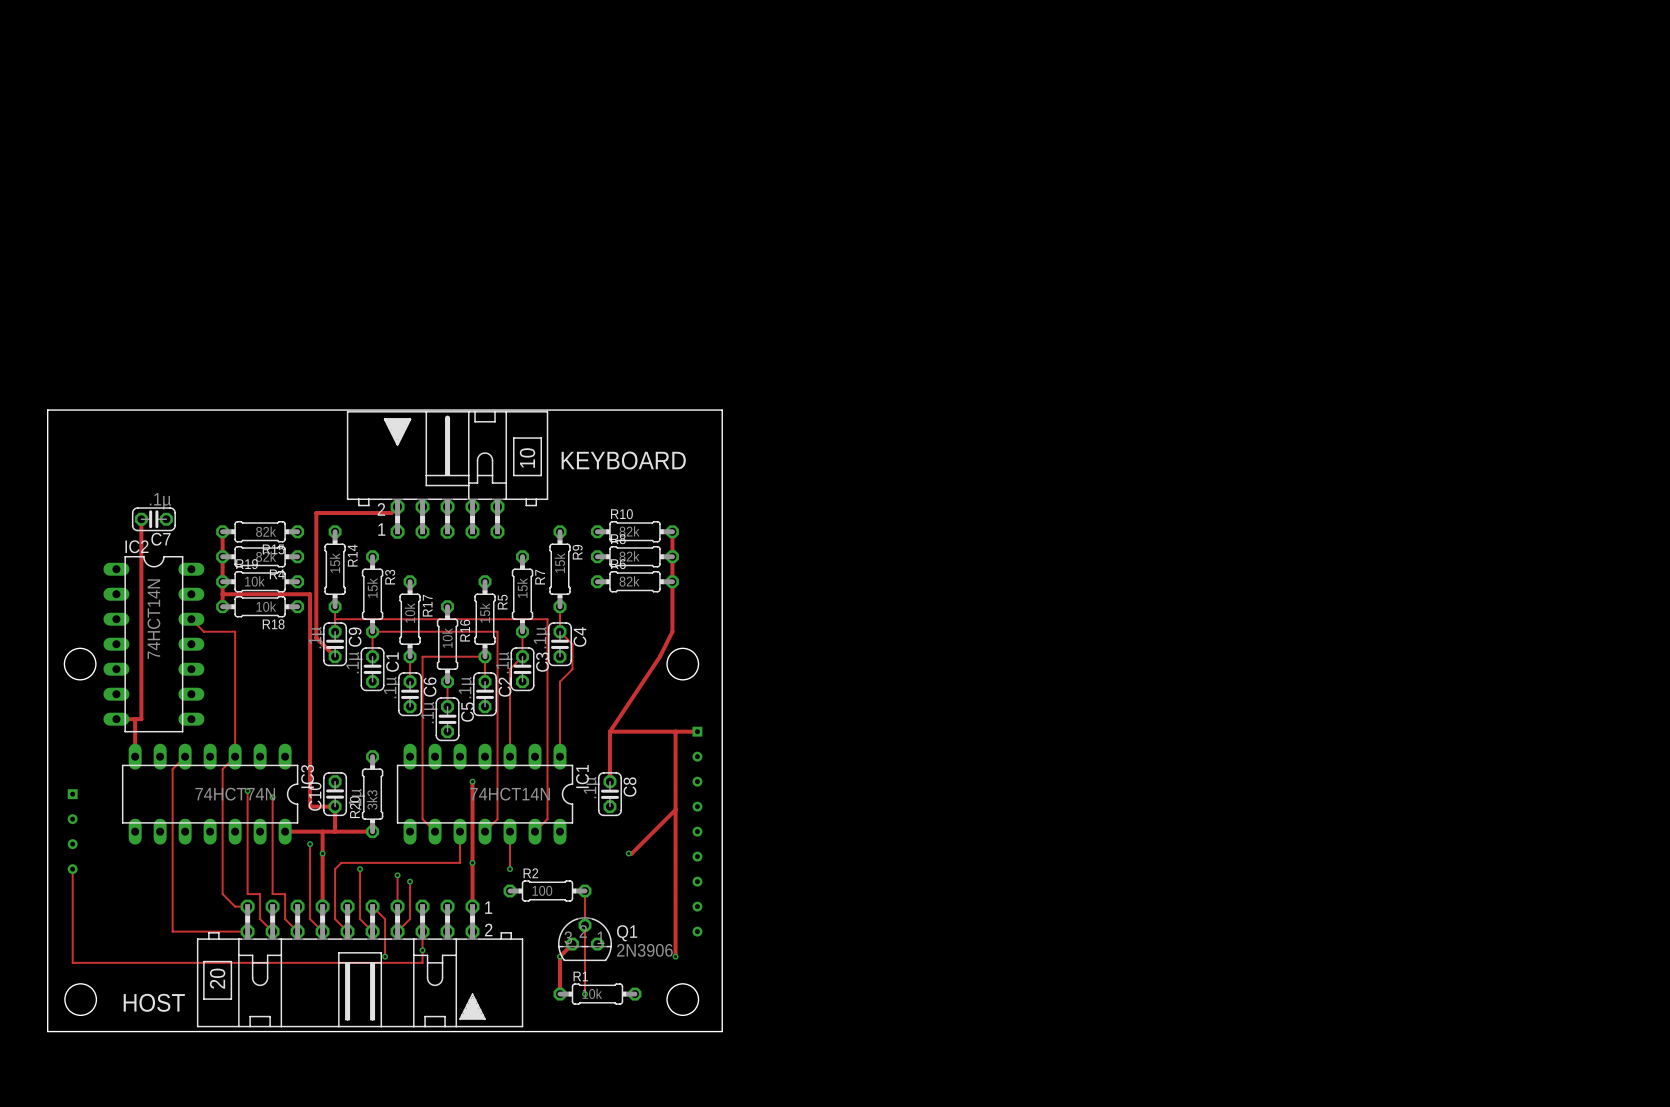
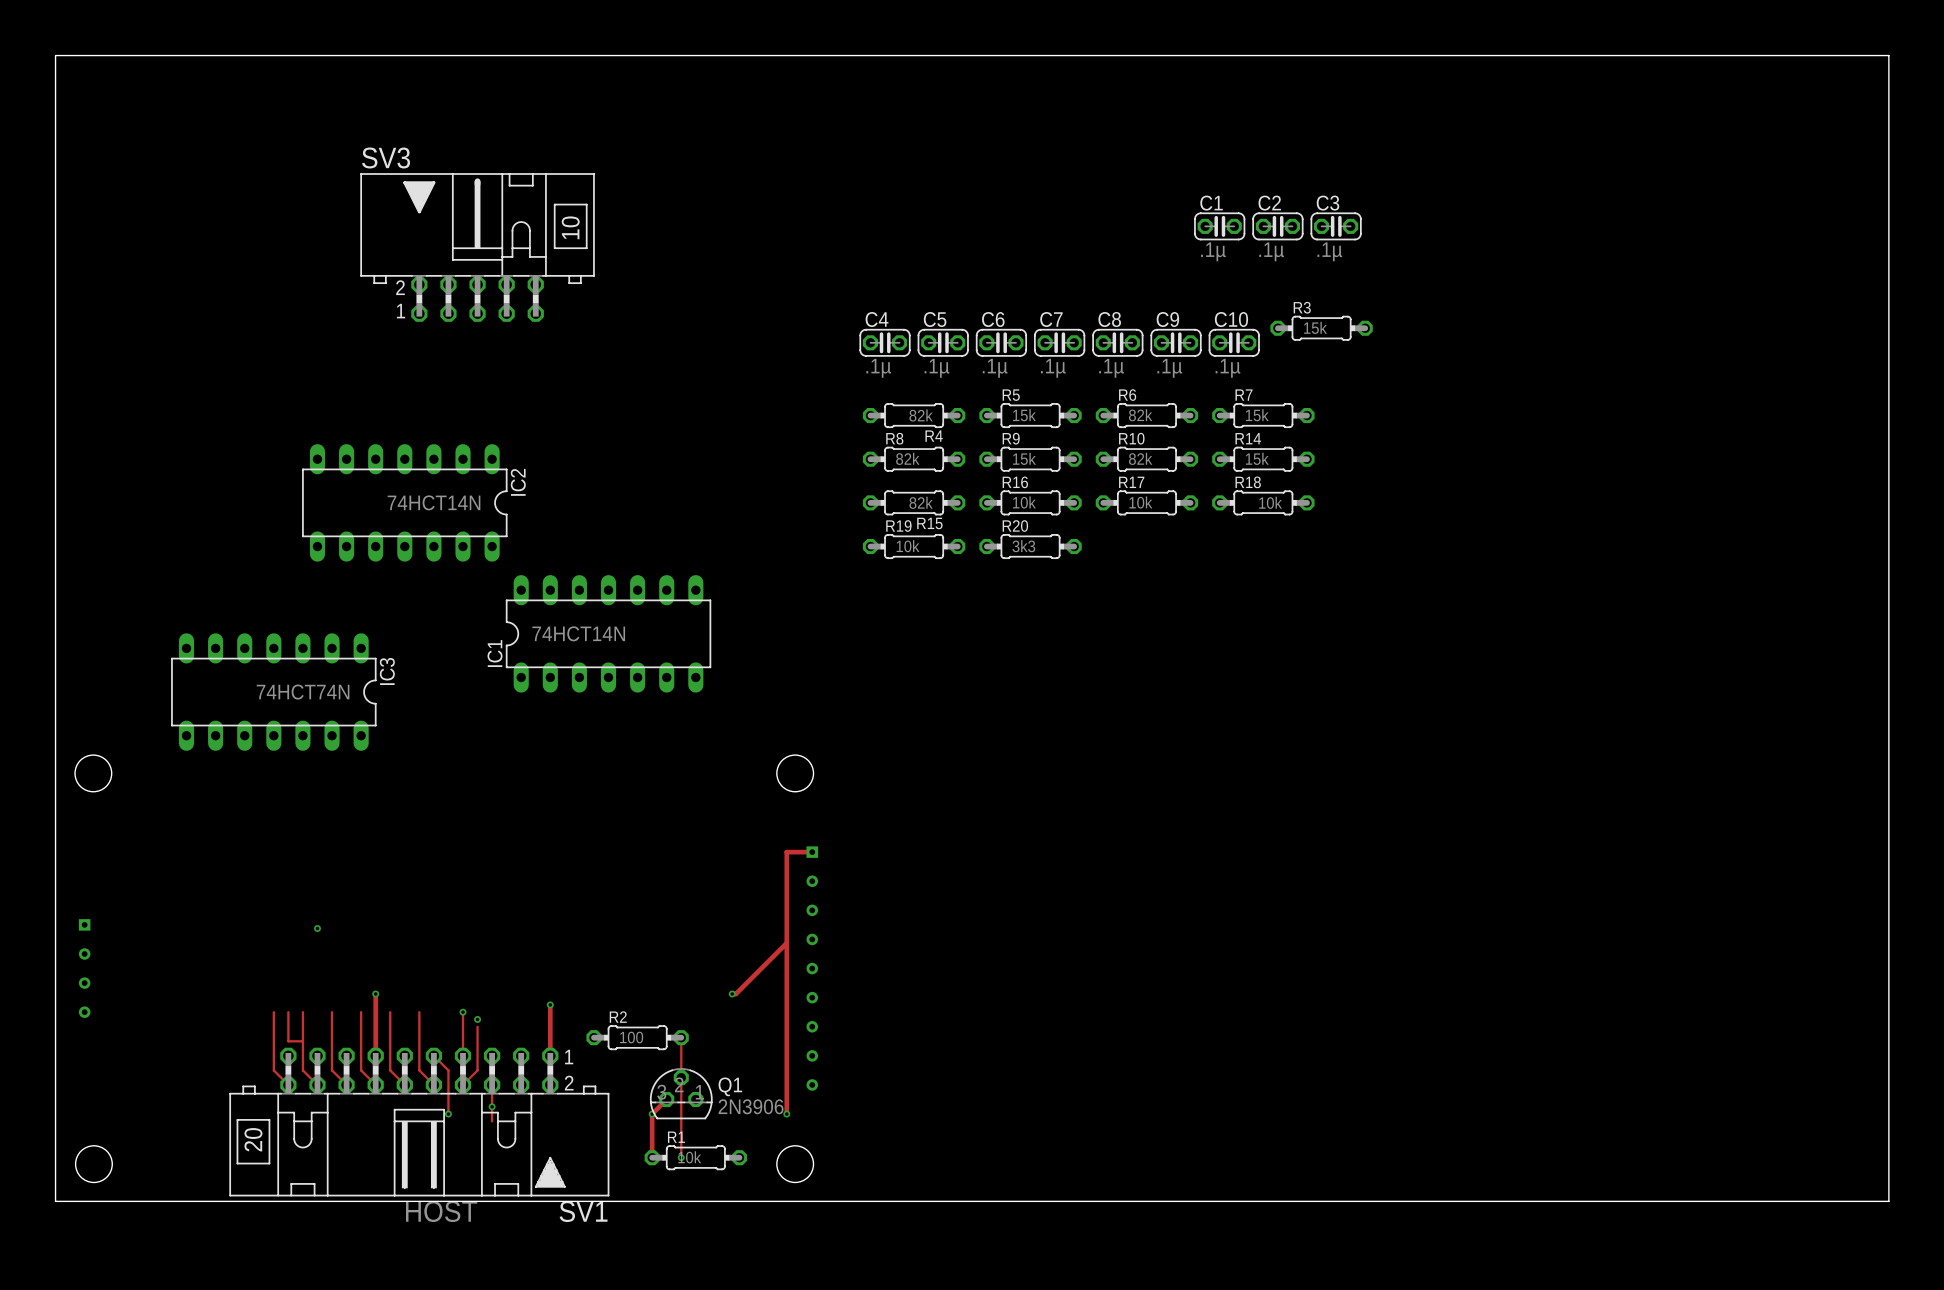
SV3: none -> (477, 247)
board edge: (47, 410) (722, 410) (722, 1031) -> (55, 477) (55, 55) (1888, 55) (1888, 1201) (841, 1201)
KEYBOARD: (447, 474) -> none
track: (397, 506) (391, 513) (316, 513) (316, 637) (335, 656) -> none
track: (141, 519) (141, 719) (116, 719) -> none
C7 rotation: 0° (153, 519) -> 180° (1059, 342)
C7 position: (153, 519) -> (1059, 342)
track: (222, 531) (222, 606) -> none
R15 position: (260, 531) -> (914, 502)
R10 position: (634, 531) -> (1146, 459)
track: (672, 531) (672, 631) (659, 656) (609, 731) -> none
R9 name position: R9 (577, 552) -> R9 (1011, 438)
R14 name position: R14 (352, 555) -> R14 (1248, 438)
R4 position: (260, 556) -> (914, 415)
R8 position: (634, 556) -> (914, 459)
R14 rotation: 0° (335, 569) -> 90° clockwise (1263, 459)
R14 position: (335, 569) -> (1263, 459)
R9 rotation: 0° (559, 569) -> 90° clockwise (1030, 459)
R9 position: (559, 569) -> (1030, 459)
R3 name position: R3 (390, 577) -> R3 (1302, 307)
R7 name position: R7 (540, 577) -> R7 (1243, 395)
R19 position: (260, 581) -> (914, 546)
R6 position: (634, 581) -> (1146, 415)
track: (222, 594) (310, 594) (310, 806) (335, 806) (335, 831) -> none
R3 rotation: 0° (372, 594) -> 90° clockwise (1321, 328)
R3 position: (372, 594) -> (1321, 328)
R7 rotation: 0° (522, 594) -> 90° clockwise (1263, 415)
R7 position: (522, 594) -> (1263, 415)
R5 name position: R5 (502, 602) -> R5 (1011, 395)
R17 name position: R17 (427, 605) -> R17 (1131, 482)
R18 position: (260, 606) -> (1263, 502)
track: (335, 606) (335, 631) -> none
track: (559, 606) (559, 631) (572, 644) (572, 669) (559, 681) (559, 756) -> none
track: (191, 619) (203, 631) (235, 631) (235, 756) (222, 769) (222, 894) (235, 906) (247, 906) -> none
track: (335, 619) (547, 619) (547, 819) (535, 831) -> none
R17 rotation: 0° (410, 619) -> 90° clockwise (1146, 502)
R17 position: (410, 619) -> (1146, 502)
R5 rotation: 0° (485, 619) -> 90° clockwise (1030, 415)
R5 position: (485, 619) -> (1030, 415)
R18 name position: R18 (273, 624) -> R18 (1248, 482)
R16 name position: R16 (465, 630) -> R16 (1015, 482)
track: (522, 631) (522, 656) (510, 669) (510, 756) -> none
IC2 rotation: 0° (153, 644) -> 90° clockwise (404, 502)
IC2 position: (153, 644) -> (404, 502)
C9 rotation: 0° (335, 644) -> 90° counterclockwise (1176, 342)
C9 position: (335, 644) -> (1176, 342)
R16 rotation: 0° (447, 644) -> 90° clockwise (1030, 502)
R16 position: (447, 644) -> (1030, 502)
C4 rotation: 0° (559, 644) -> 90° counterclockwise (885, 342)
C4 position: (559, 644) -> (885, 342)
track: (372, 656) (372, 631) (497, 631) (497, 819) (485, 831) -> none
track: (410, 656) (410, 681) -> none
C1 rotation: 0° (372, 669) -> 90° counterclockwise (1219, 226)
C1 position: (372, 669) -> (1219, 226)
C3 rotation: 0° (522, 669) -> 90° counterclockwise (1336, 226)
C3 position: (522, 669) -> (1336, 226)
track: (447, 681) (447, 706) -> none
track: (485, 681) (485, 656) (422, 656) (422, 819) (435, 831) -> none
C6 rotation: 0° (410, 694) -> 90° counterclockwise (1001, 342)
C6 position: (410, 694) -> (1001, 342)
C2 rotation: 0° (485, 694) -> 90° counterclockwise (1277, 226)
C2 position: (485, 694) -> (1277, 226)
track: (135, 719) (135, 756) -> none
C5 rotation: 0° (447, 719) -> 90° counterclockwise (943, 342)
C5 position: (447, 719) -> (943, 342)
track: (609, 731) (675, 731) -> none
track: (609, 731) (609, 781) -> none
track: (185, 756) (172, 769) (172, 931) (247, 931) -> (273, 1012) (273, 1070) (288, 1084)
track: (472, 781) (472, 862) -> none
via: (472, 781) -> none
track: (247, 791) (247, 869) -> none
via: (247, 791) -> none
IC3 position: (210, 794) -> (273, 692)
C10 rotation: 0° (335, 794) -> 90° clockwise (1234, 342)
C10 position: (335, 794) -> (1234, 342)
R20 rotation: 0° (372, 794) -> 90° clockwise (1030, 546)
R20 position: (372, 794) -> (1030, 546)
IC1 rotation: 0° (485, 794) -> 180° (608, 633)
IC1 position: (485, 794) -> (608, 633)
C8 rotation: 0° (609, 794) -> 90° counterclockwise (1117, 342)
C8 position: (609, 794) -> (1117, 342)
track: (272, 797) (272, 894) (285, 894) -> (332, 1012) (332, 1041)
track: (285, 831) (372, 831) -> none
track: (322, 831) (322, 853) -> none
track: (460, 831) (460, 862) (341, 862) (335, 869) -> none
track: (510, 831) (510, 869) -> none
track: (310, 844) (310, 869) -> (302, 1012) (302, 1041)
via: (310, 844) -> none
track: (72, 869) (72, 962) (422, 962) -> none
via: (360, 869) -> none
track: none -> (463, 1012) (463, 1019)
via: none -> (463, 1012)
via: (510, 869) -> none
via: (397, 875) -> none
via: none -> (477, 1019)
via: (410, 881) -> none
HOST name: HOST (154, 1002) -> SV1 (583, 1211)
HOST value: none -> HOST (441, 1211)

